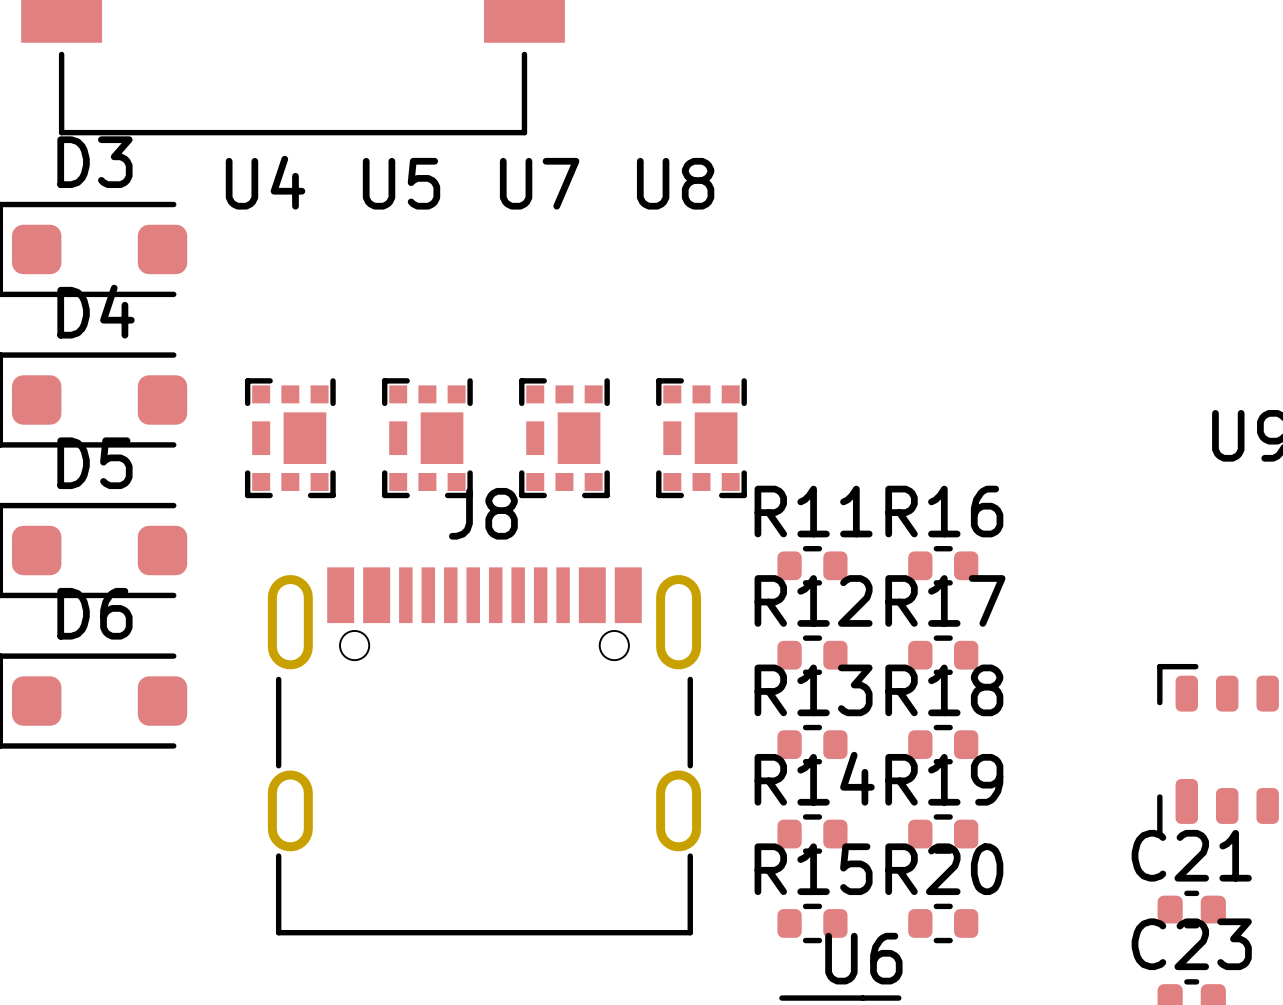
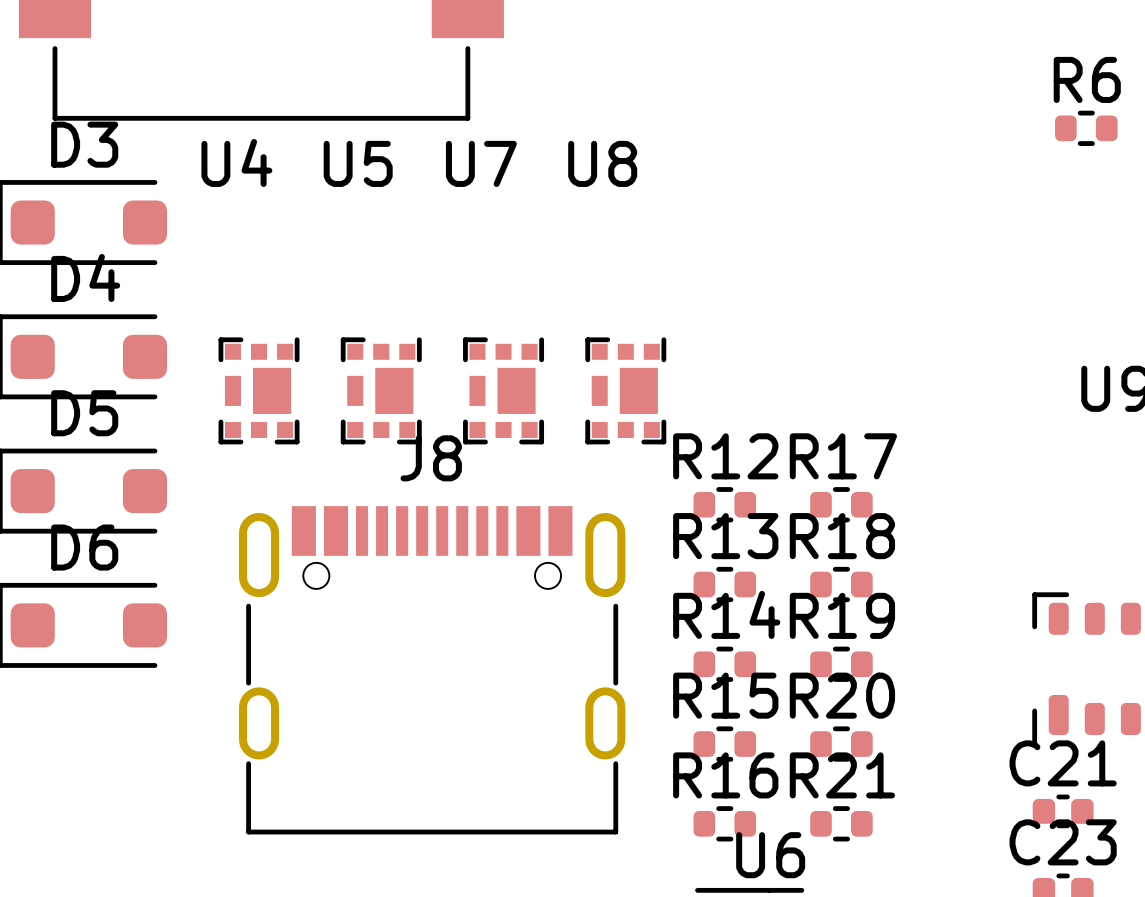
R6: none -> (1086, 128)
R11 name: R11 (813, 511) -> R12 (725, 456)
R16 name: R16 (944, 511) -> R17 (843, 456)
R12 name: R12 (813, 600) -> R13 (725, 536)
R17 name: R17 (945, 600) -> R18 (842, 536)
R13 name: R13 (813, 690) -> R14 (726, 614)
R18 name: R18 (944, 690) -> R19 (842, 615)
R14 name: R14 (814, 778) -> R15 (725, 695)
R19 name: R19 (944, 779) -> R20 (842, 695)
R15 name: R15 (813, 869) -> R16 (725, 775)
R20 name: R20 (944, 869) -> R21 (842, 775)

